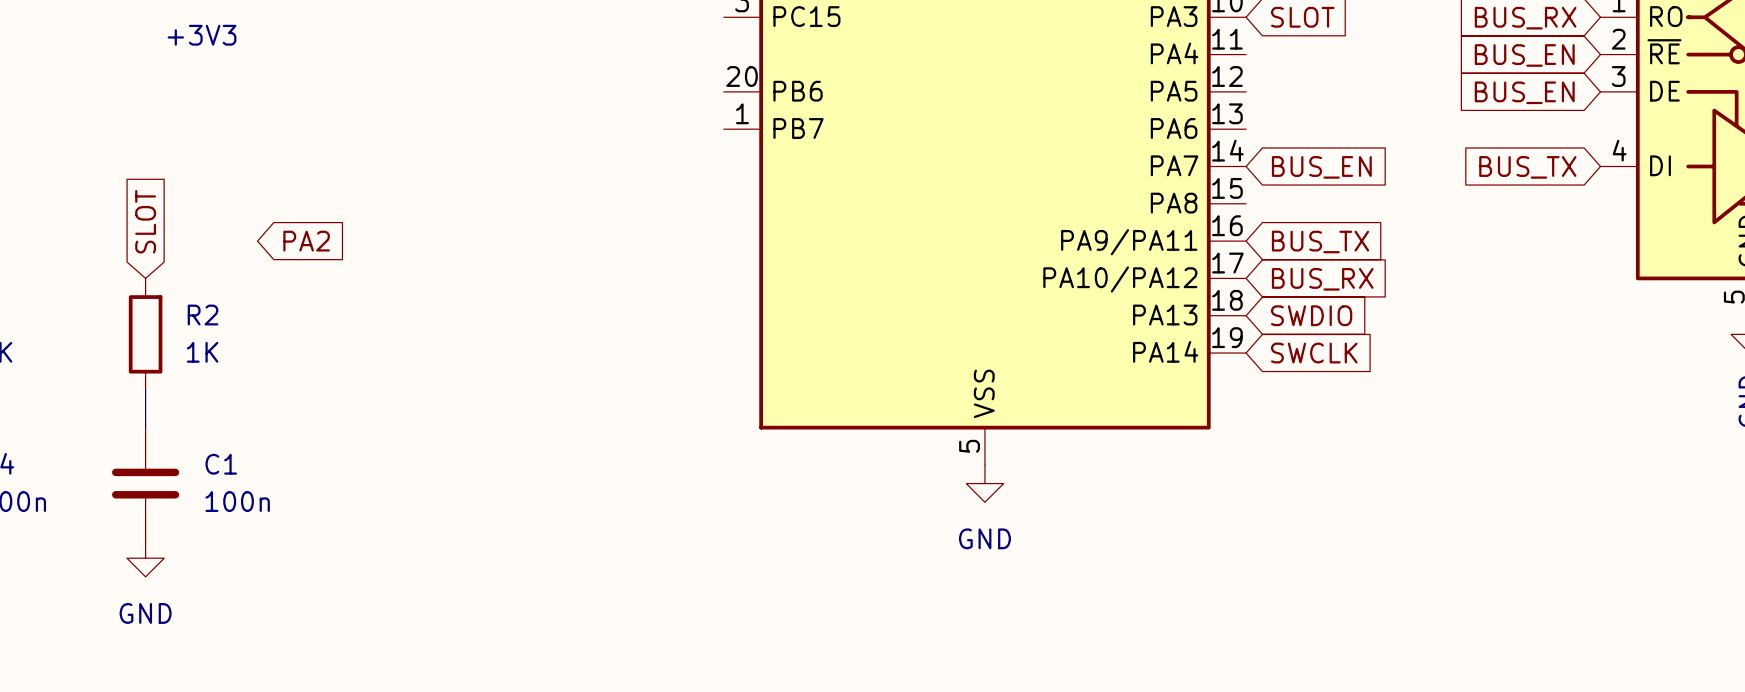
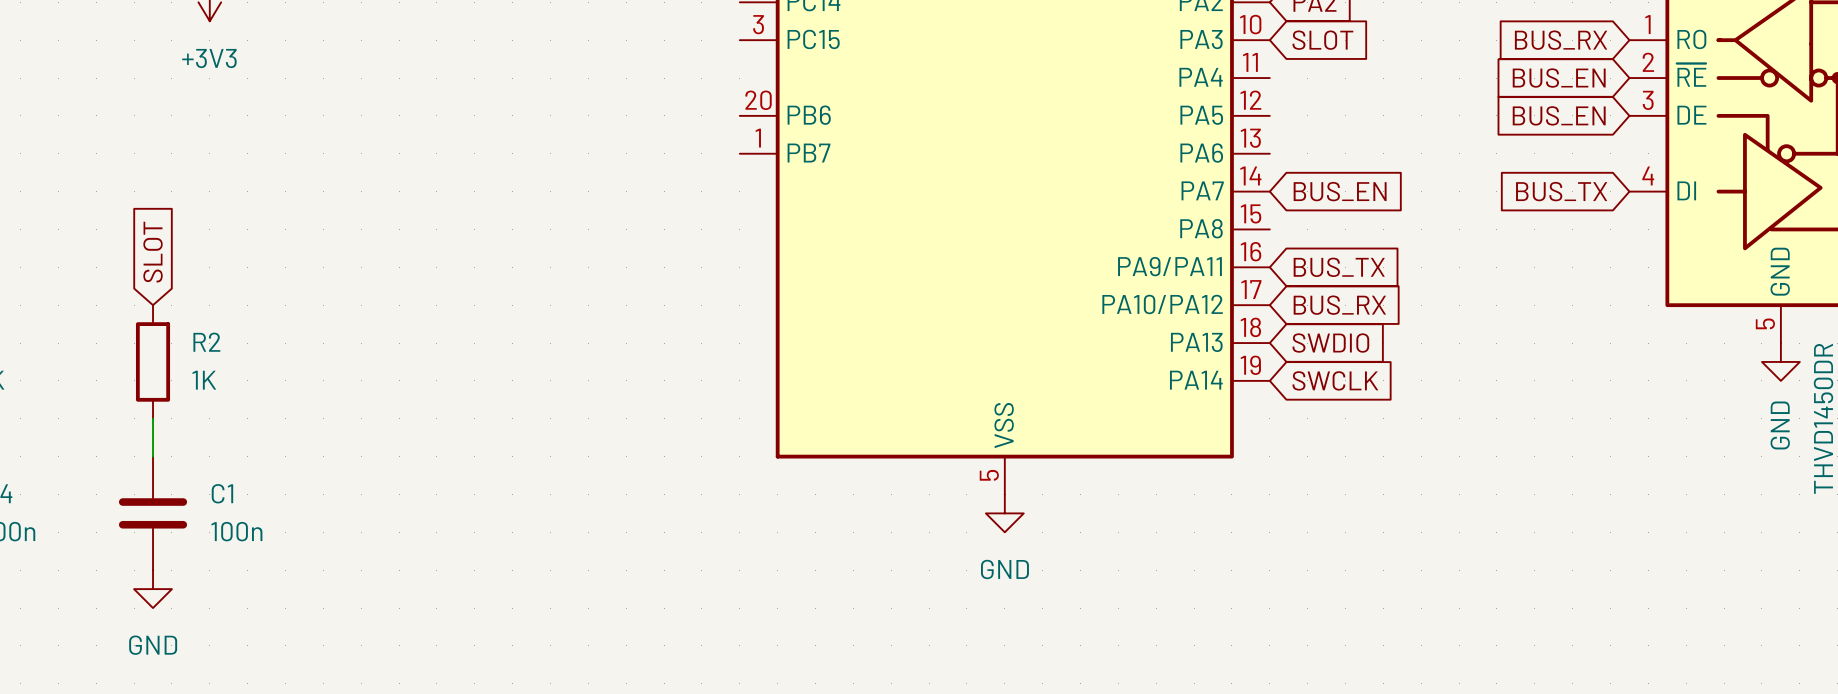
global label: PA2 (306, 241) -> none

